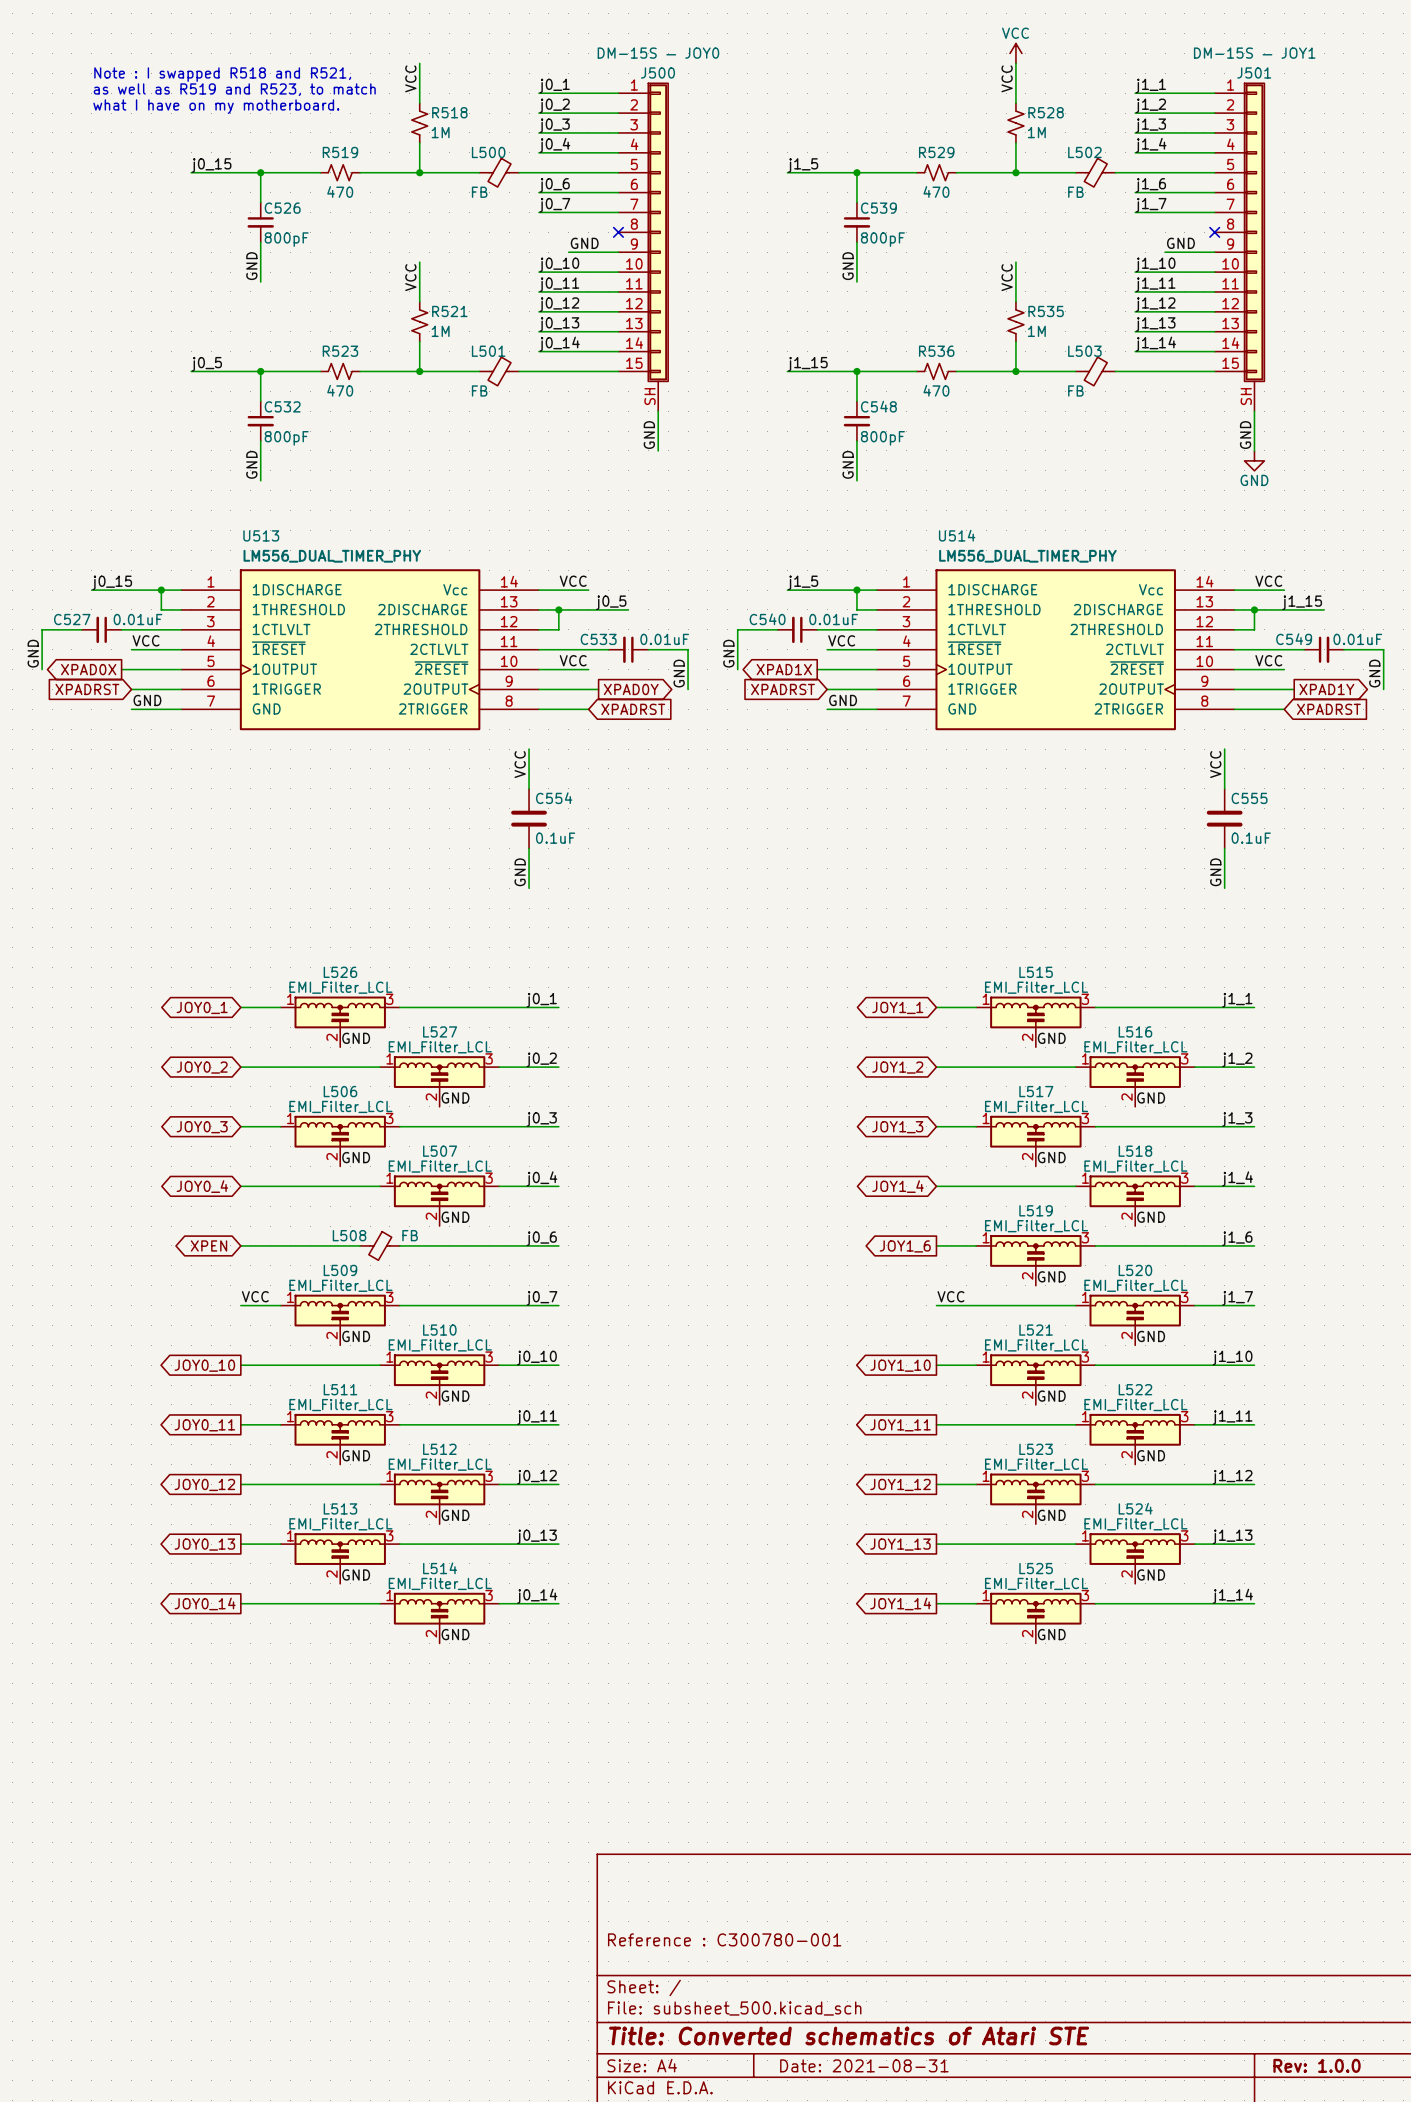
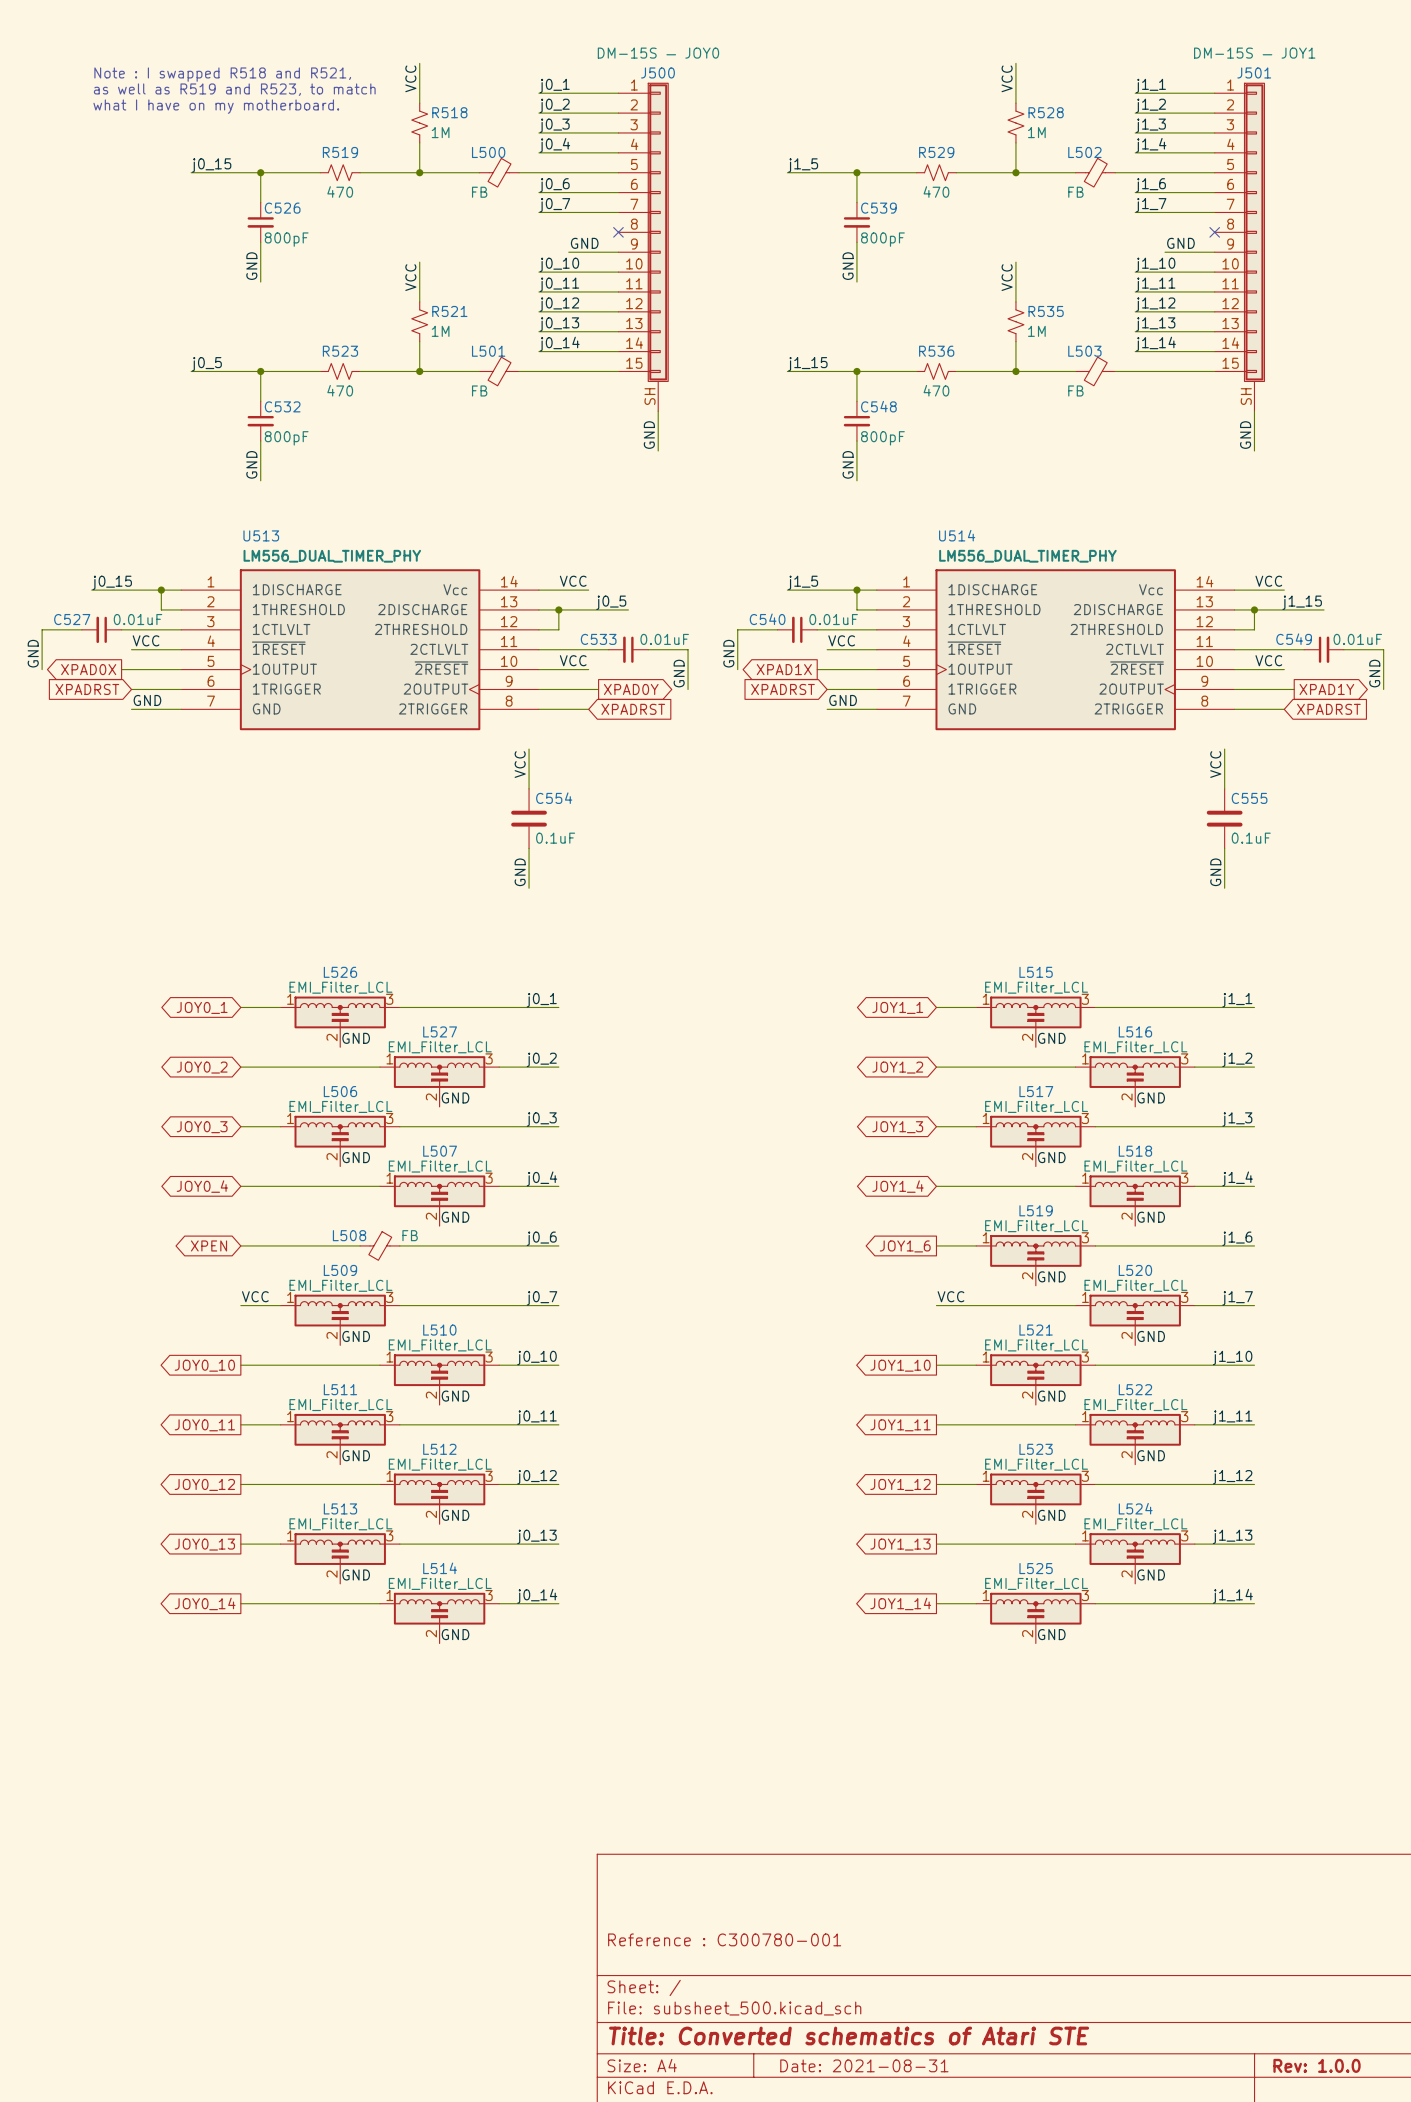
power symbol: VCC (1015, 53) -> none
power symbol: GND (1254, 460) -> none

